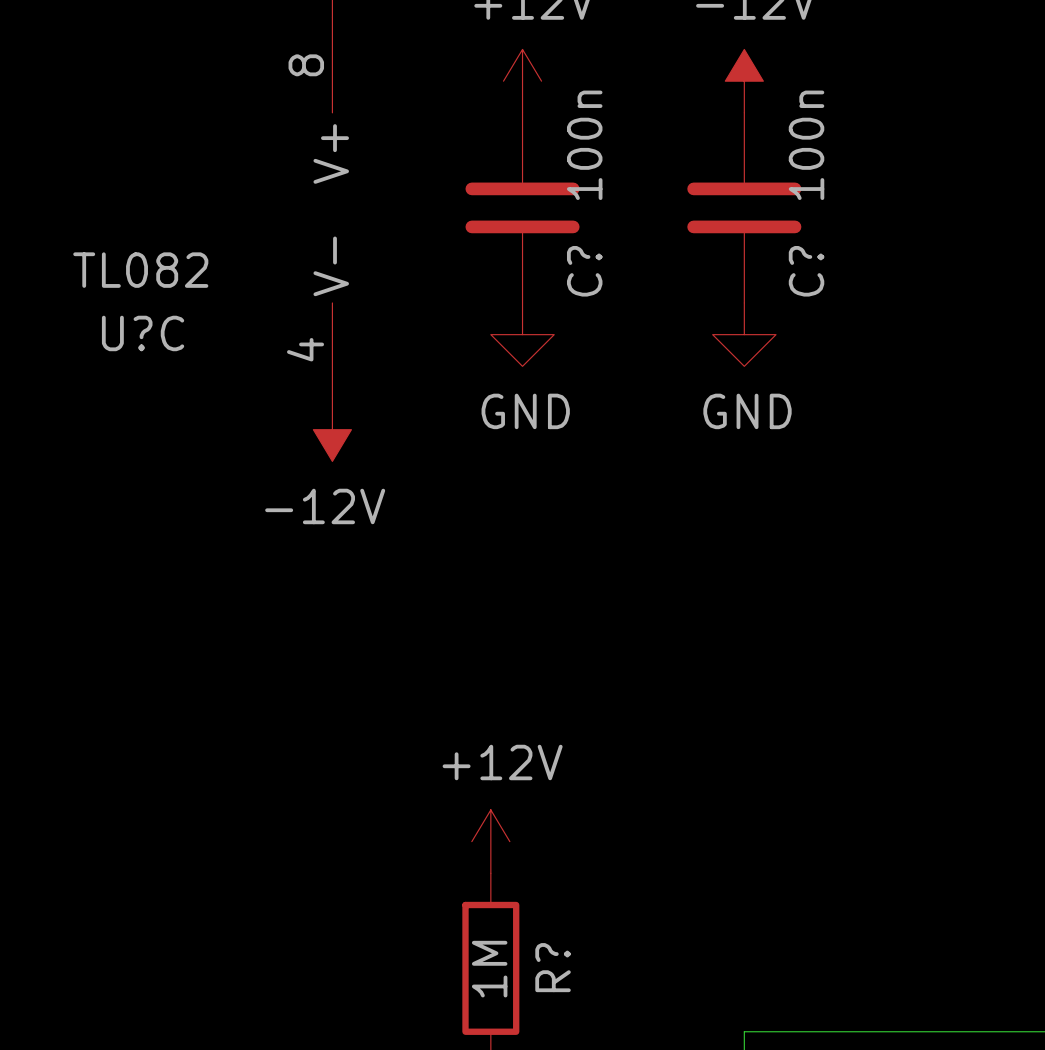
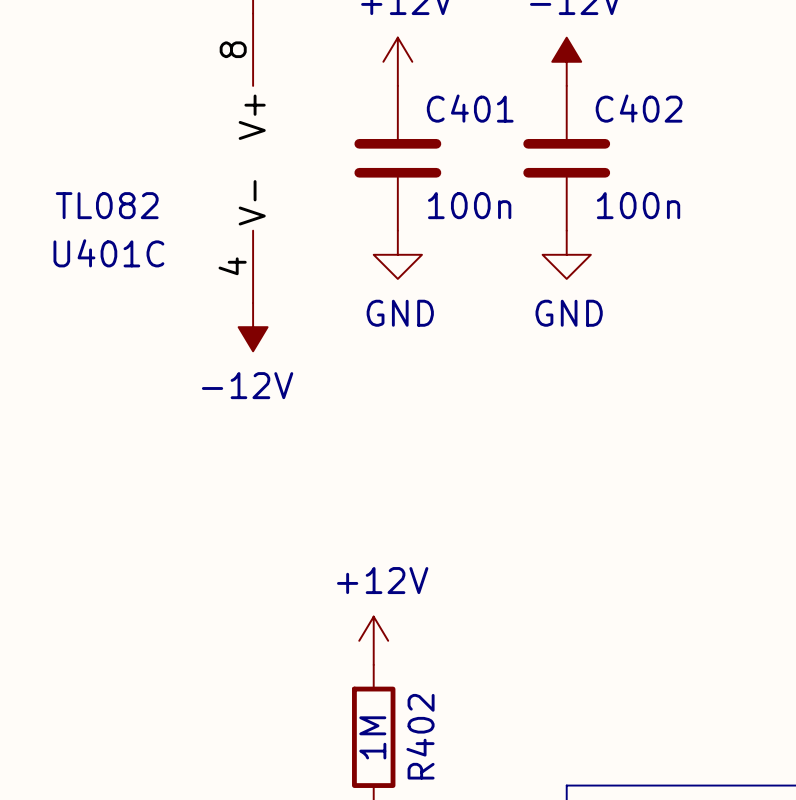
C? value rotation: 0° (584, 145) -> 90° clockwise (469, 205)
C? value rotation: 0° (806, 145) -> 90° clockwise (638, 205)
C? name: C? (584, 271) -> C401 (470, 108)
C? name: C? (806, 271) -> C402 (639, 108)
U?C name: U?C (143, 333) -> U401C (108, 253)
R? name: R? (553, 967) -> R402 (420, 736)

